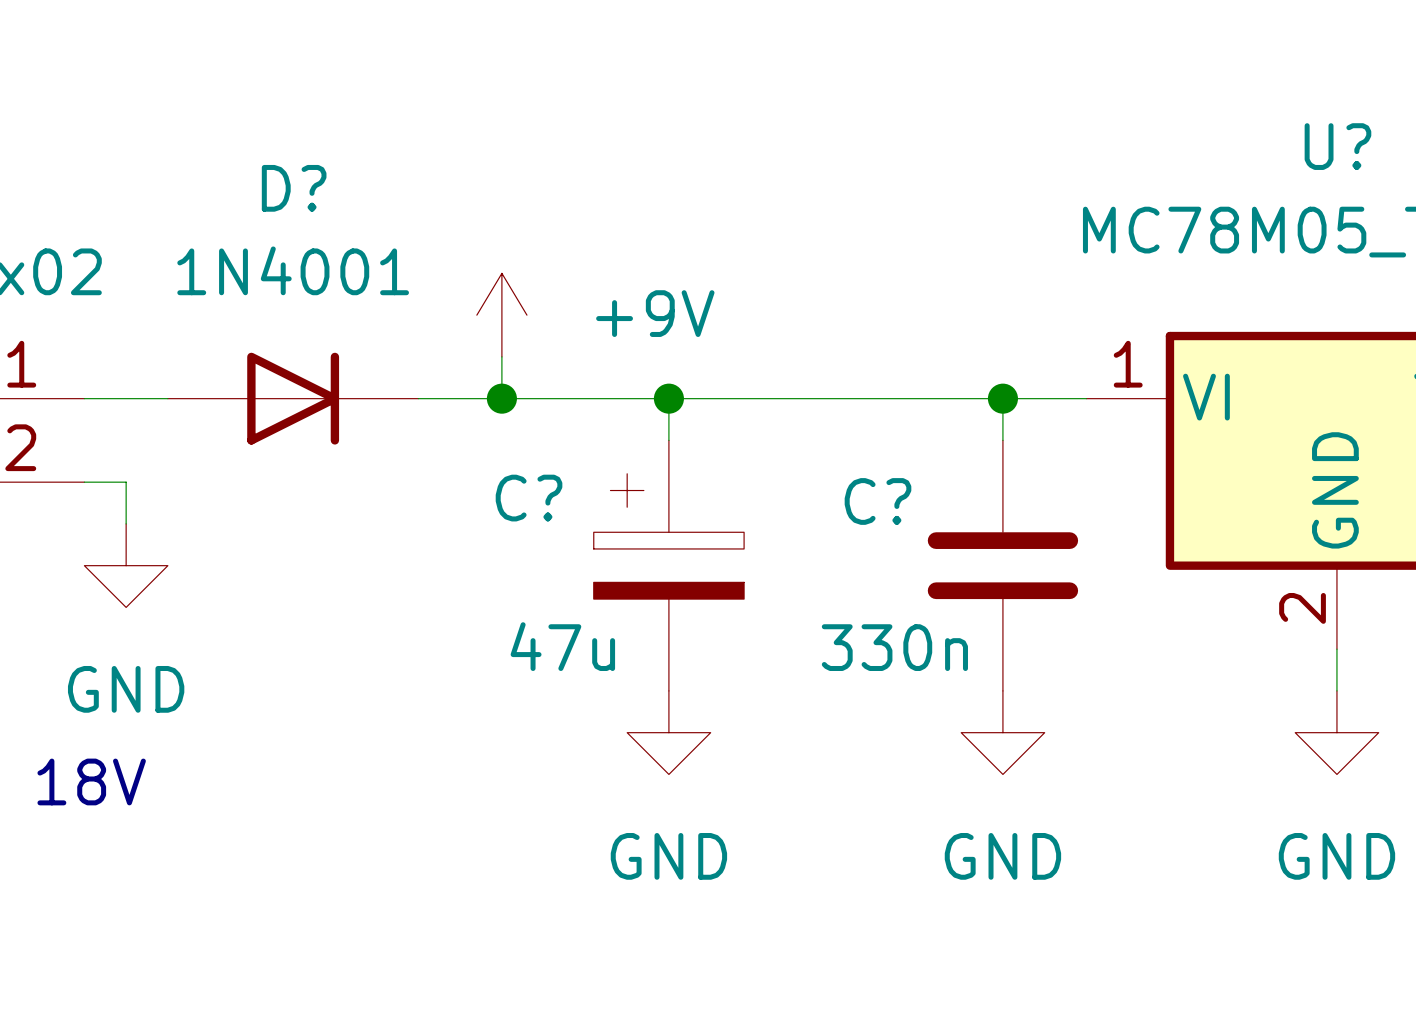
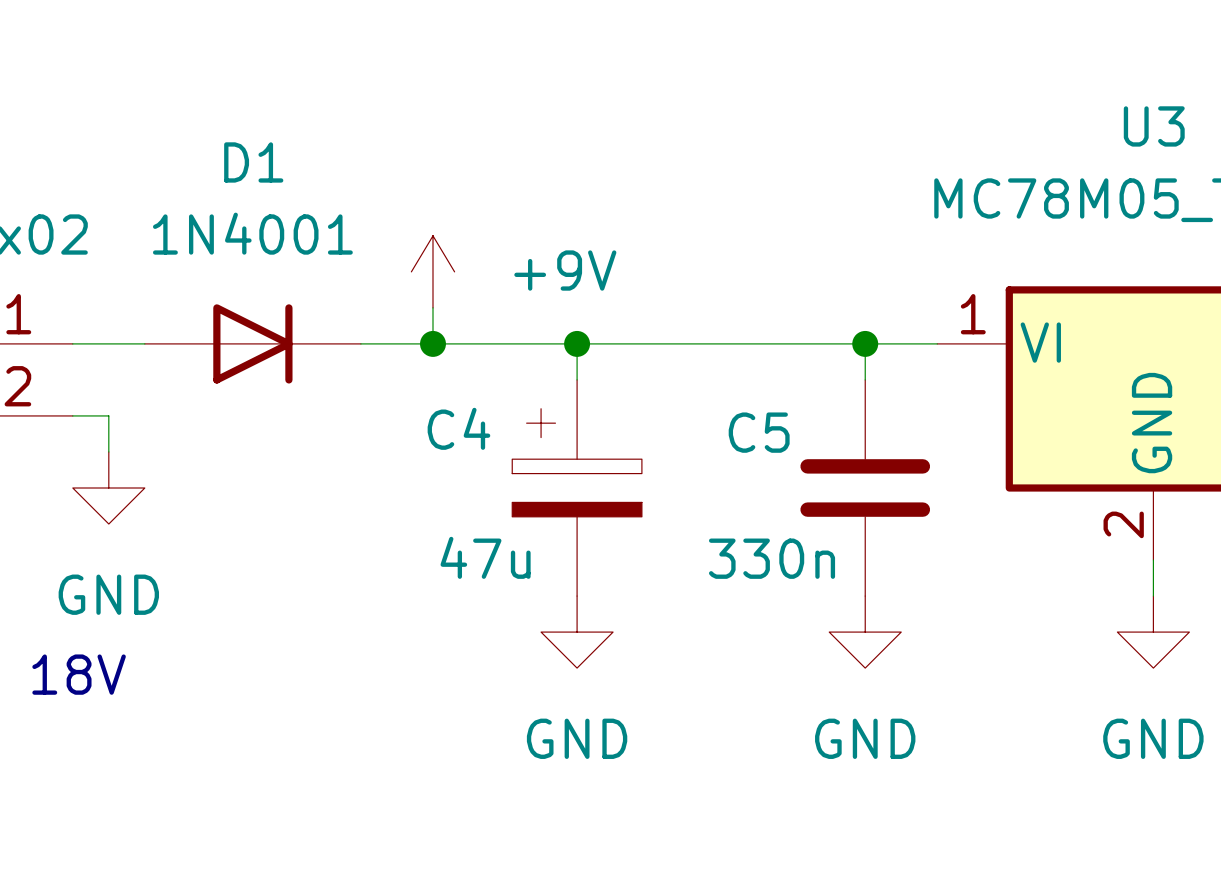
U? name: U? (1337, 146) -> U3 (1154, 126)
D? name: D? (294, 188) -> D1 (253, 162)
C? name: C? (529, 498) -> C4 (458, 428)
C? name: C? (878, 501) -> C5 (759, 432)

